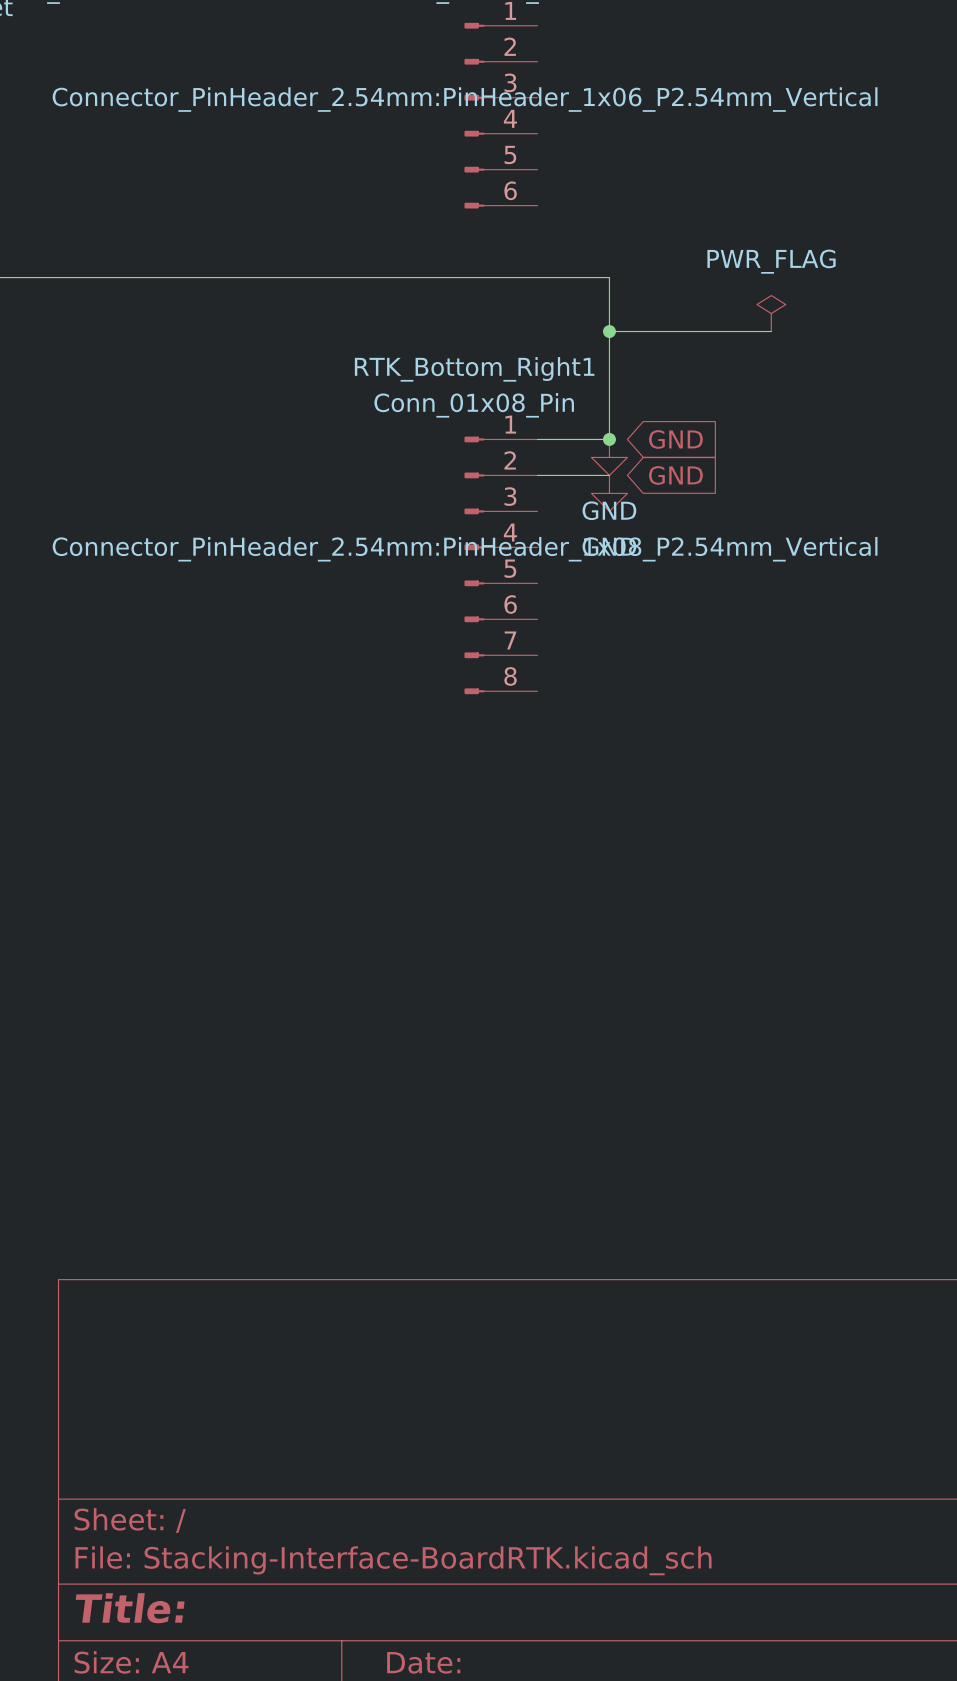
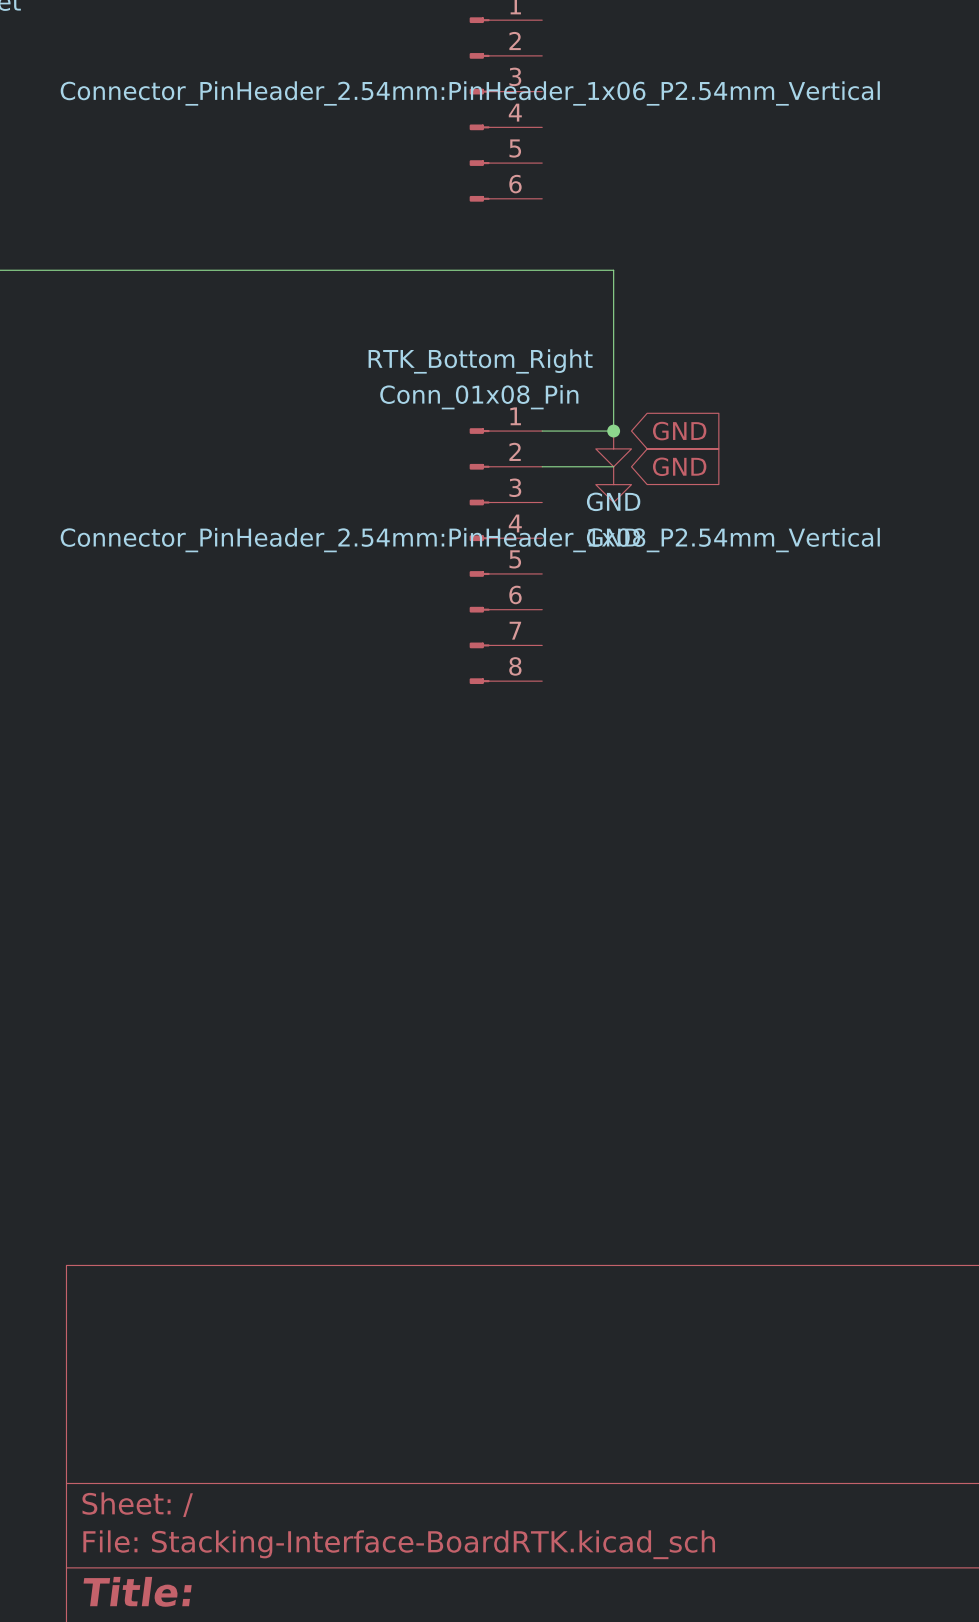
power symbol: PWR_FLAG (771, 313) -> none
wire: (609, 331) (771, 331) -> none
junction: (609, 331) -> none
RTK_Bottom_Right1 name: RTK_Bottom_Right1 (474, 369) -> RTK_Bottom_Right (480, 361)

